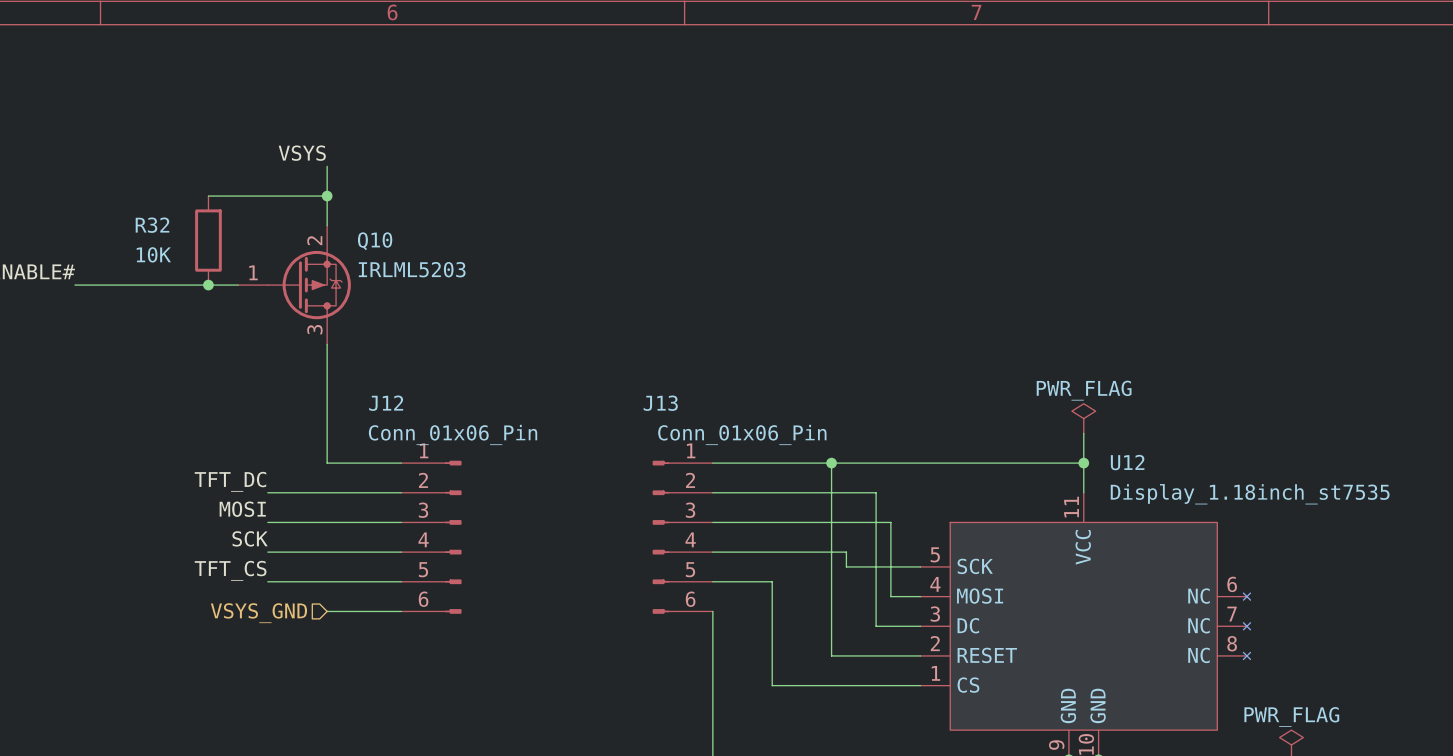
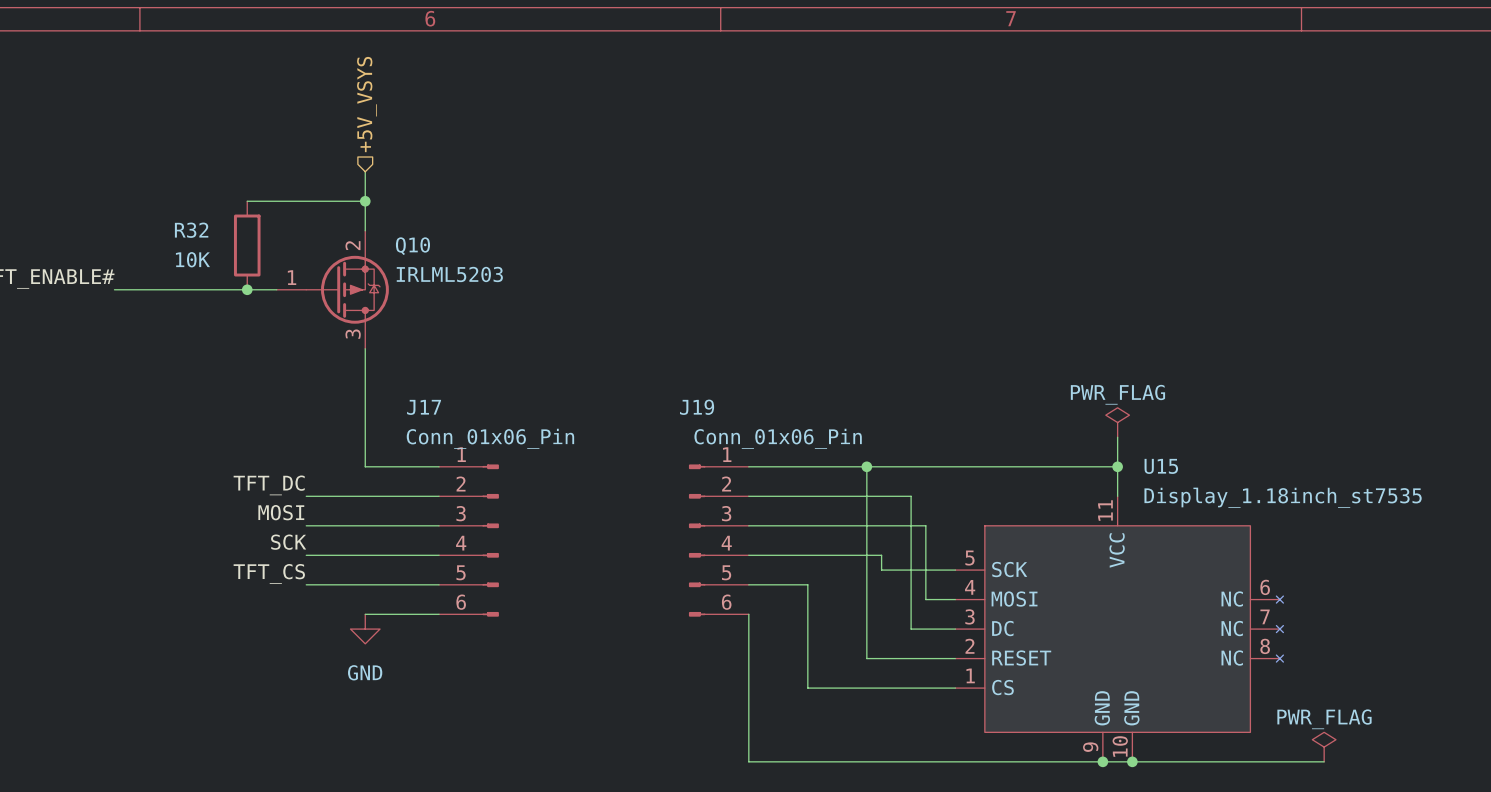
hierarchical label: none -> +5V_VSYS (366, 104)
label: VSYS (302, 153) -> none
J12 name: J12 (386, 403) -> J17 (424, 407)
J13 name: J13 (660, 403) -> J19 (697, 407)
U12 name: U12 (1127, 462) -> U15 (1161, 466)
hierarchical label: VSYS_GND (258, 613) -> none
power symbol: none -> GND (365, 629)

